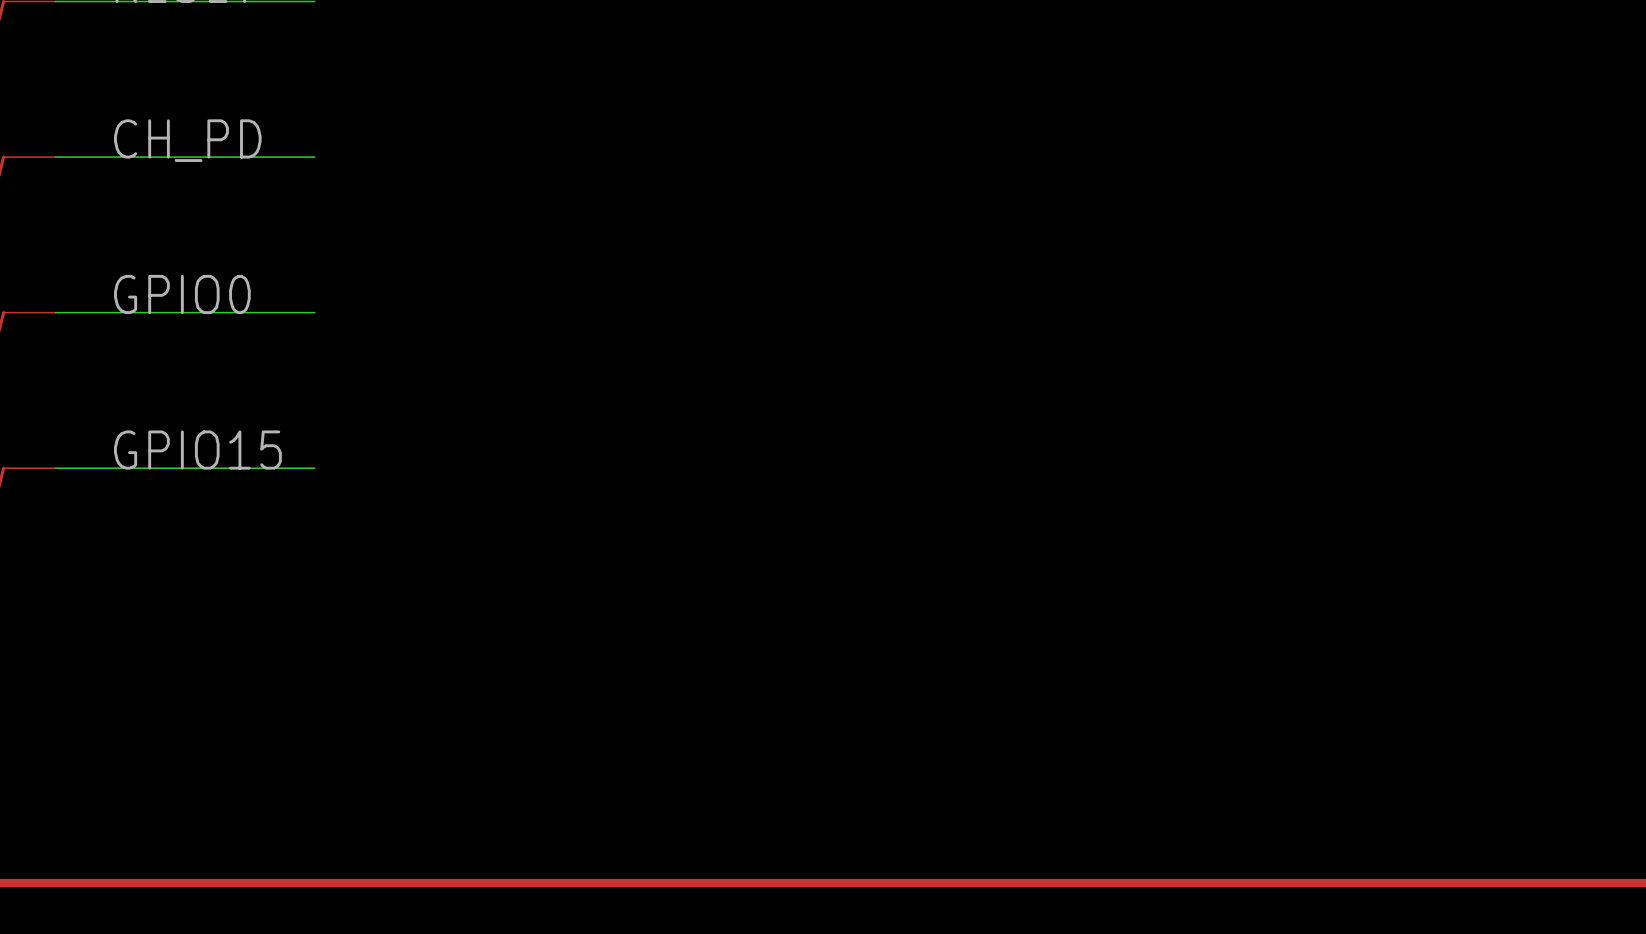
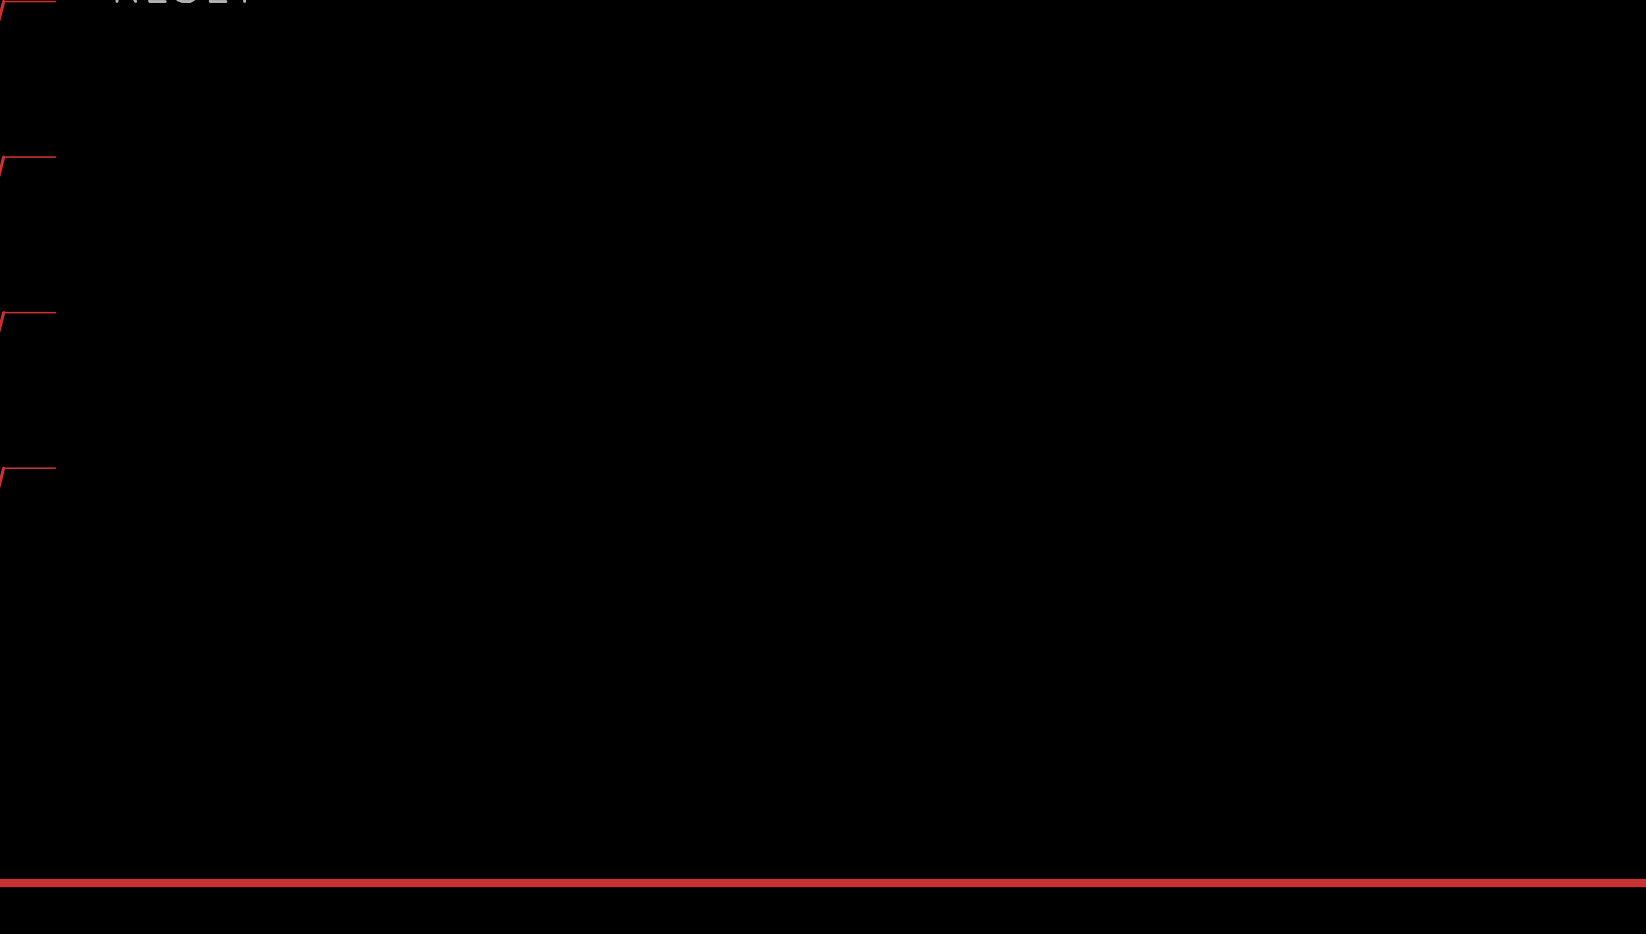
wire: (55, 1) (314, 1) -> none
label: CH_PD (187, 140) -> none
wire: (55, 157) (314, 157) -> none
label: GPIO0 (182, 294) -> none
wire: (55, 312) (314, 312) -> none
label: GPIO15 (197, 450) -> none
wire: (55, 468) (314, 468) -> none

